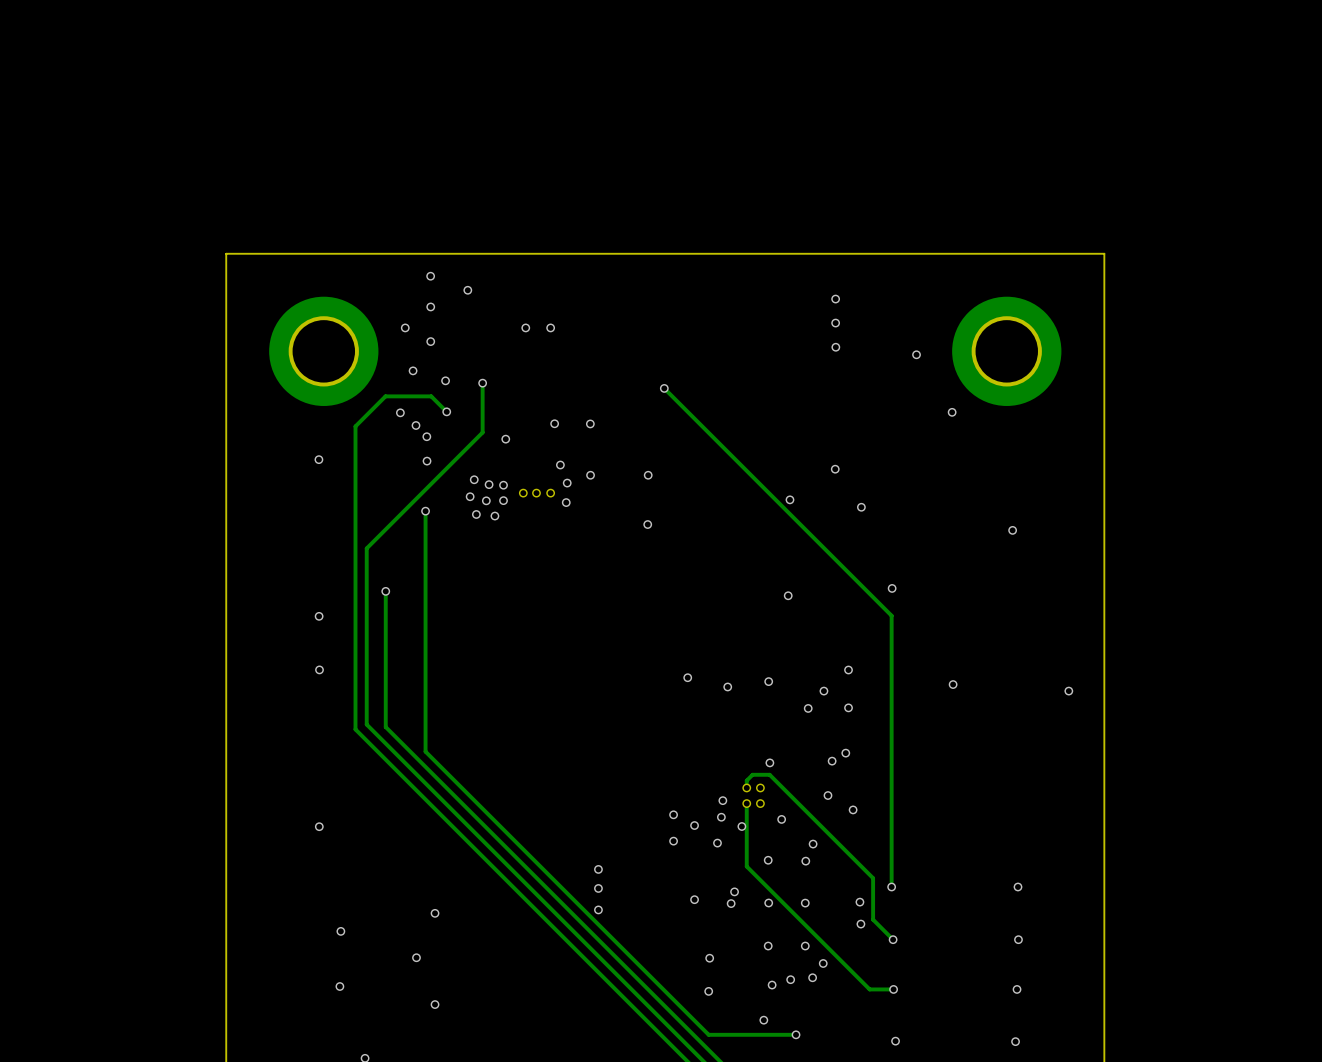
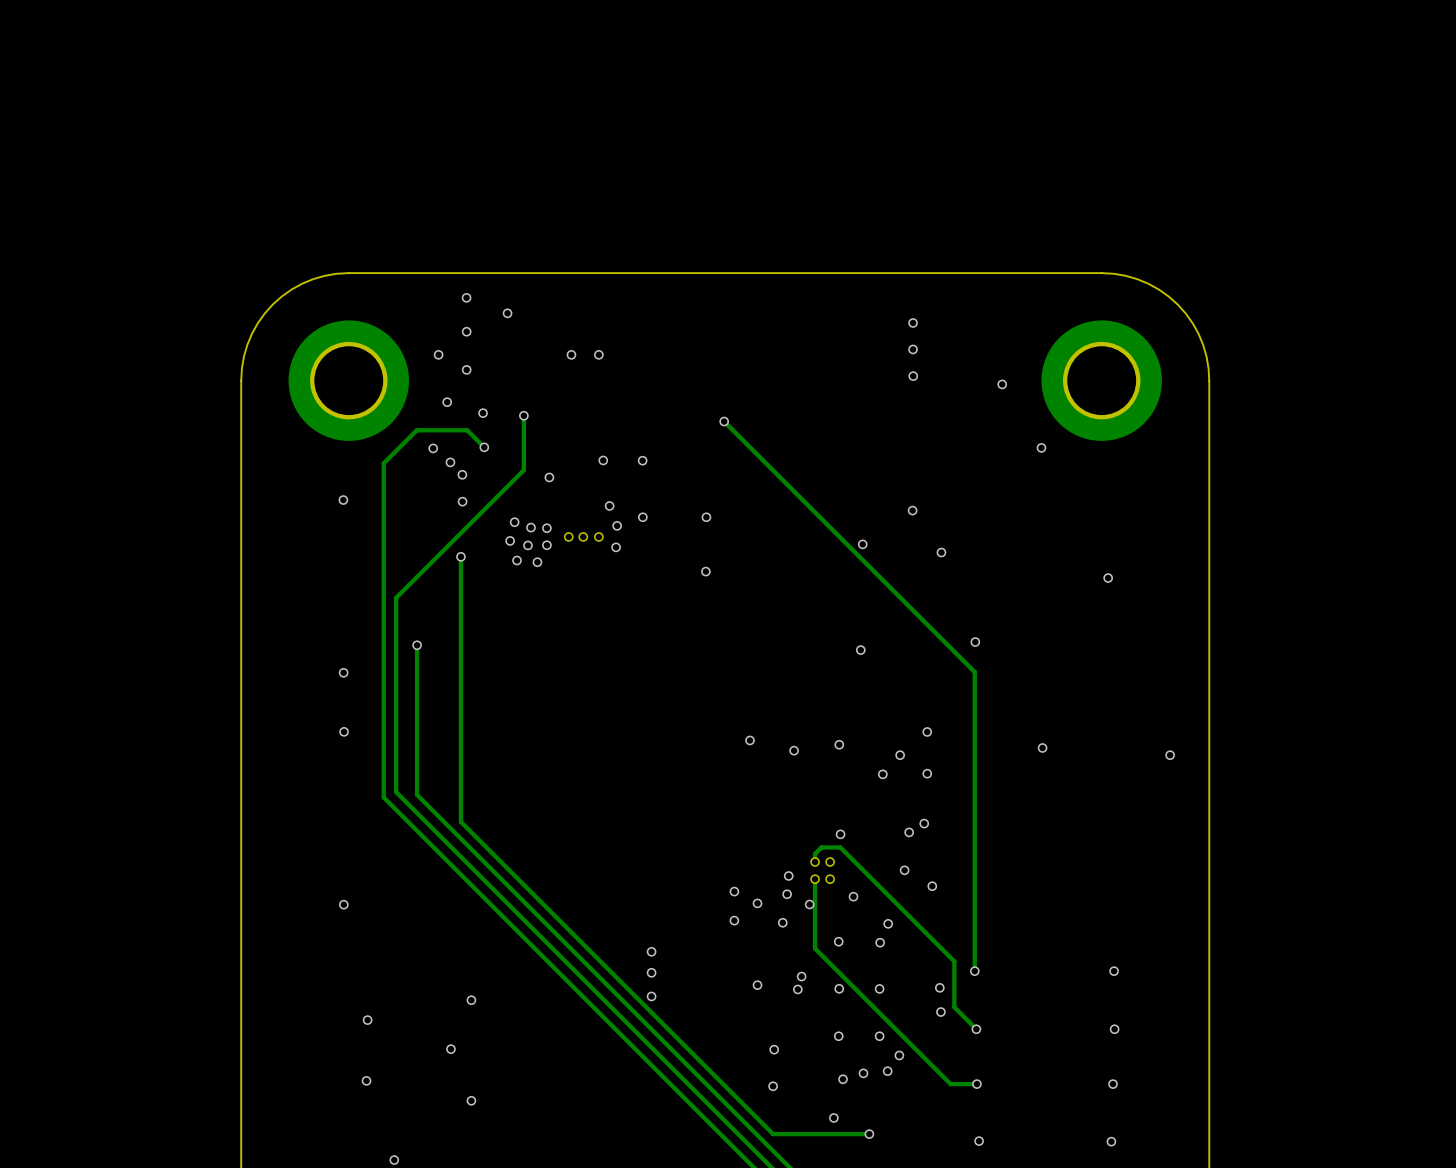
board edge: (323, 253) (226, 253) (226, 351) -> (348, 273) (313, 279) (291, 289) (272, 304) (251, 333) (243, 356) (241, 380)
board edge: (1006, 253) (1104, 253) (1104, 351) -> (1101, 273) (1125, 275) (1148, 283) (1177, 304) (1192, 323) (1203, 345) (1209, 380)

